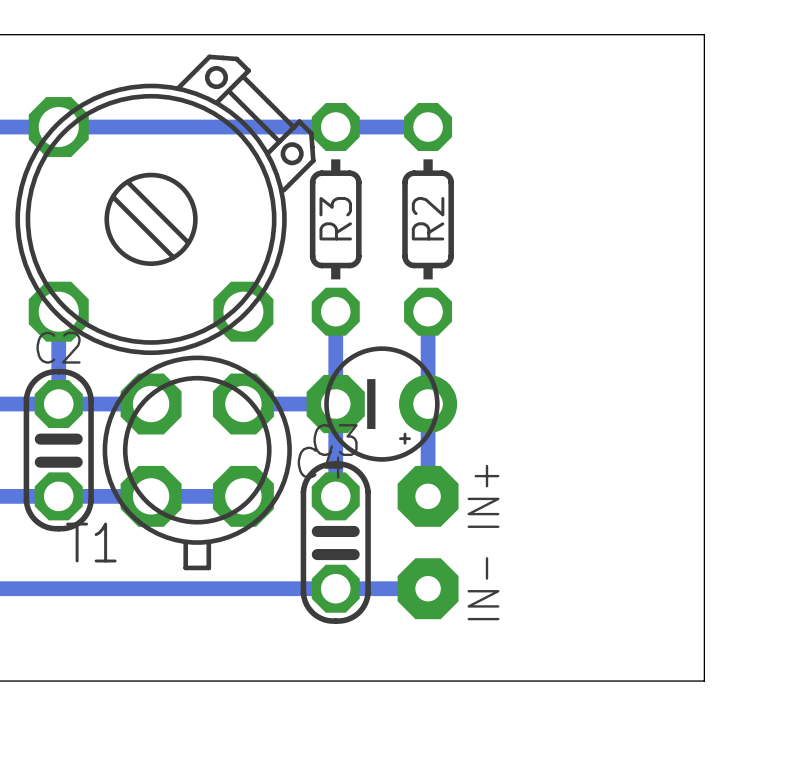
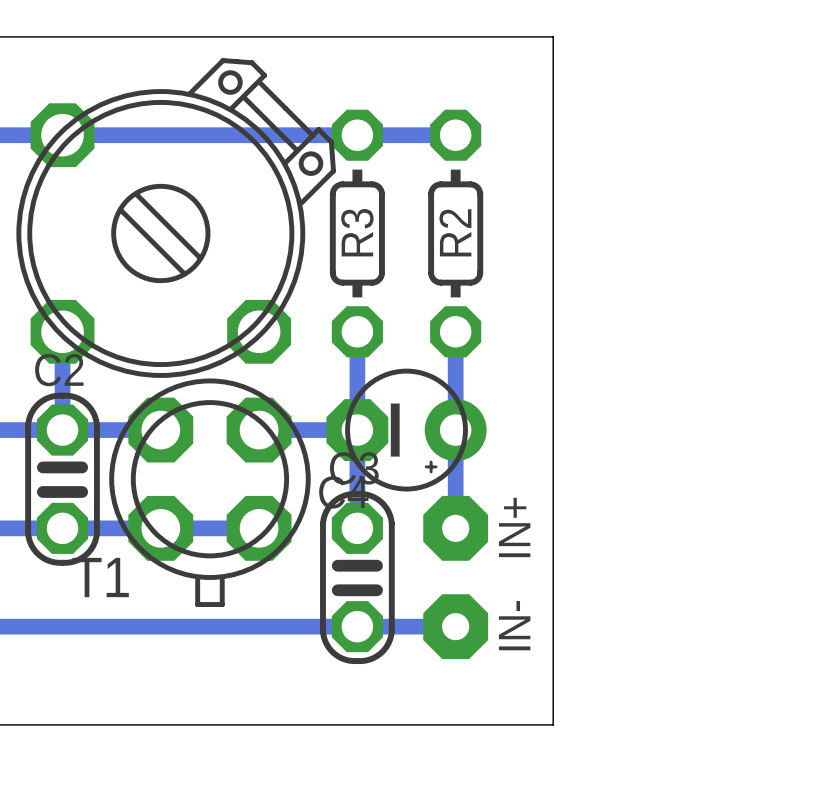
board edge: (519, 34) (704, 34) (704, 681) (519, 681) -> (553, 36) (553, 724)

